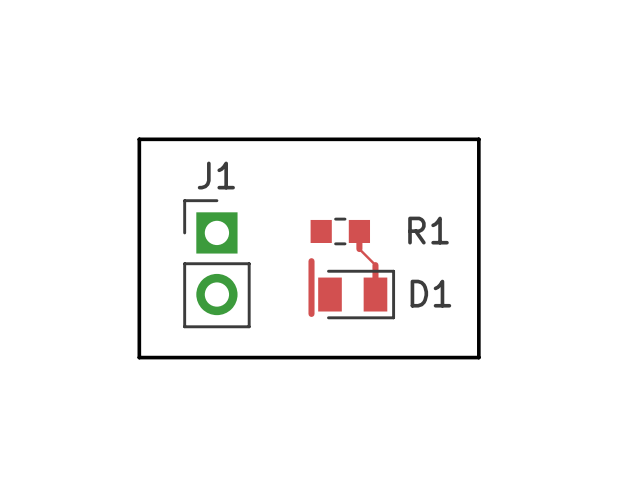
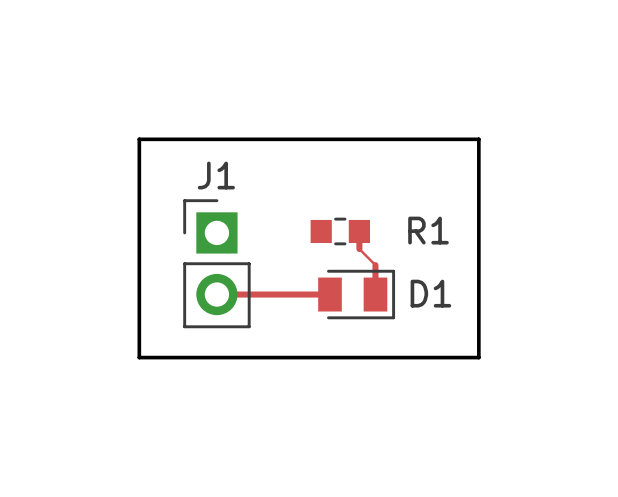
track: (311, 261) (311, 313) -> none
track: none -> (216, 294) (330, 294)

